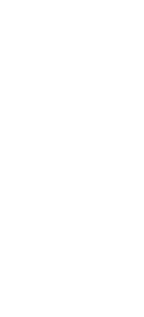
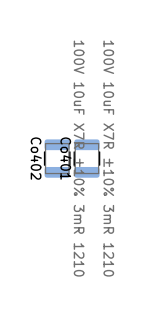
Co402: none -> 100V 10uF X7R ±10% 3mR 1210 (57, 158)
Co401: none -> 100V 10uF X7R ±10% 3mR 1210 (86, 158)

